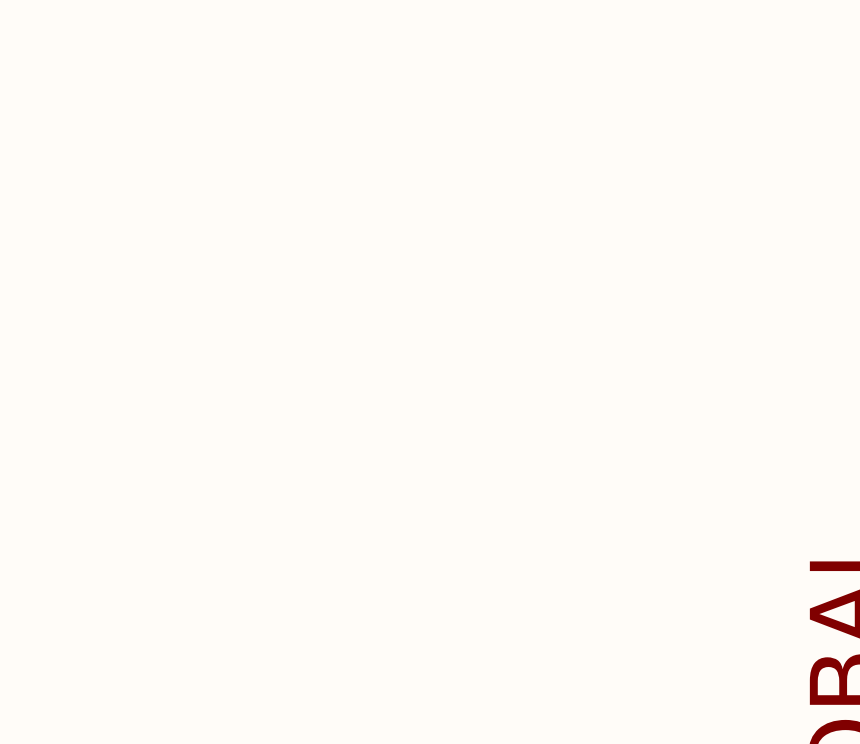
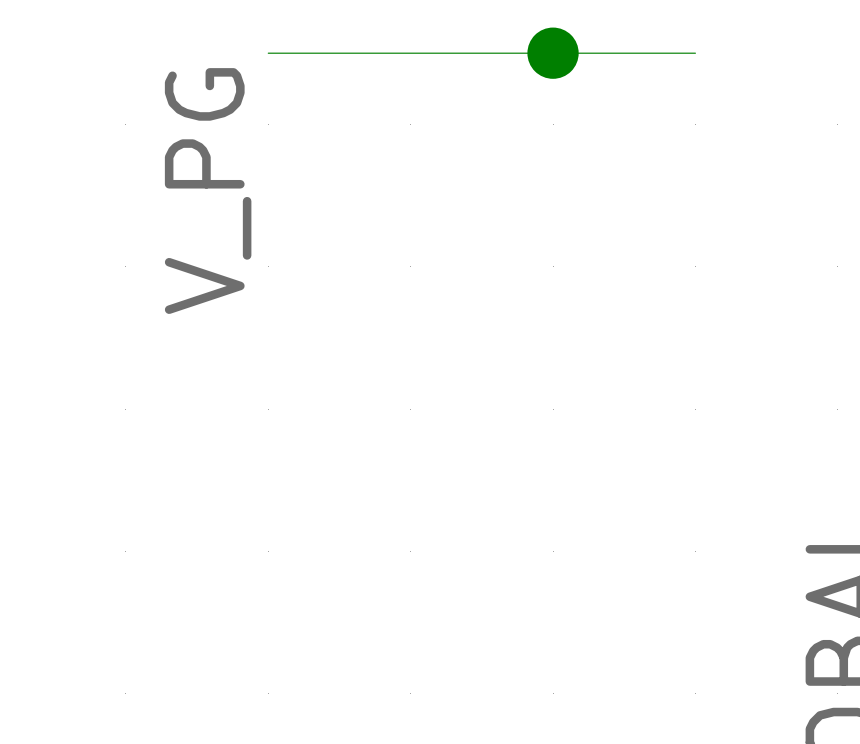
wire: none -> (268, 53) (695, 53)
junction: none -> (553, 53)
label: none -> V_PG (208, 191)

